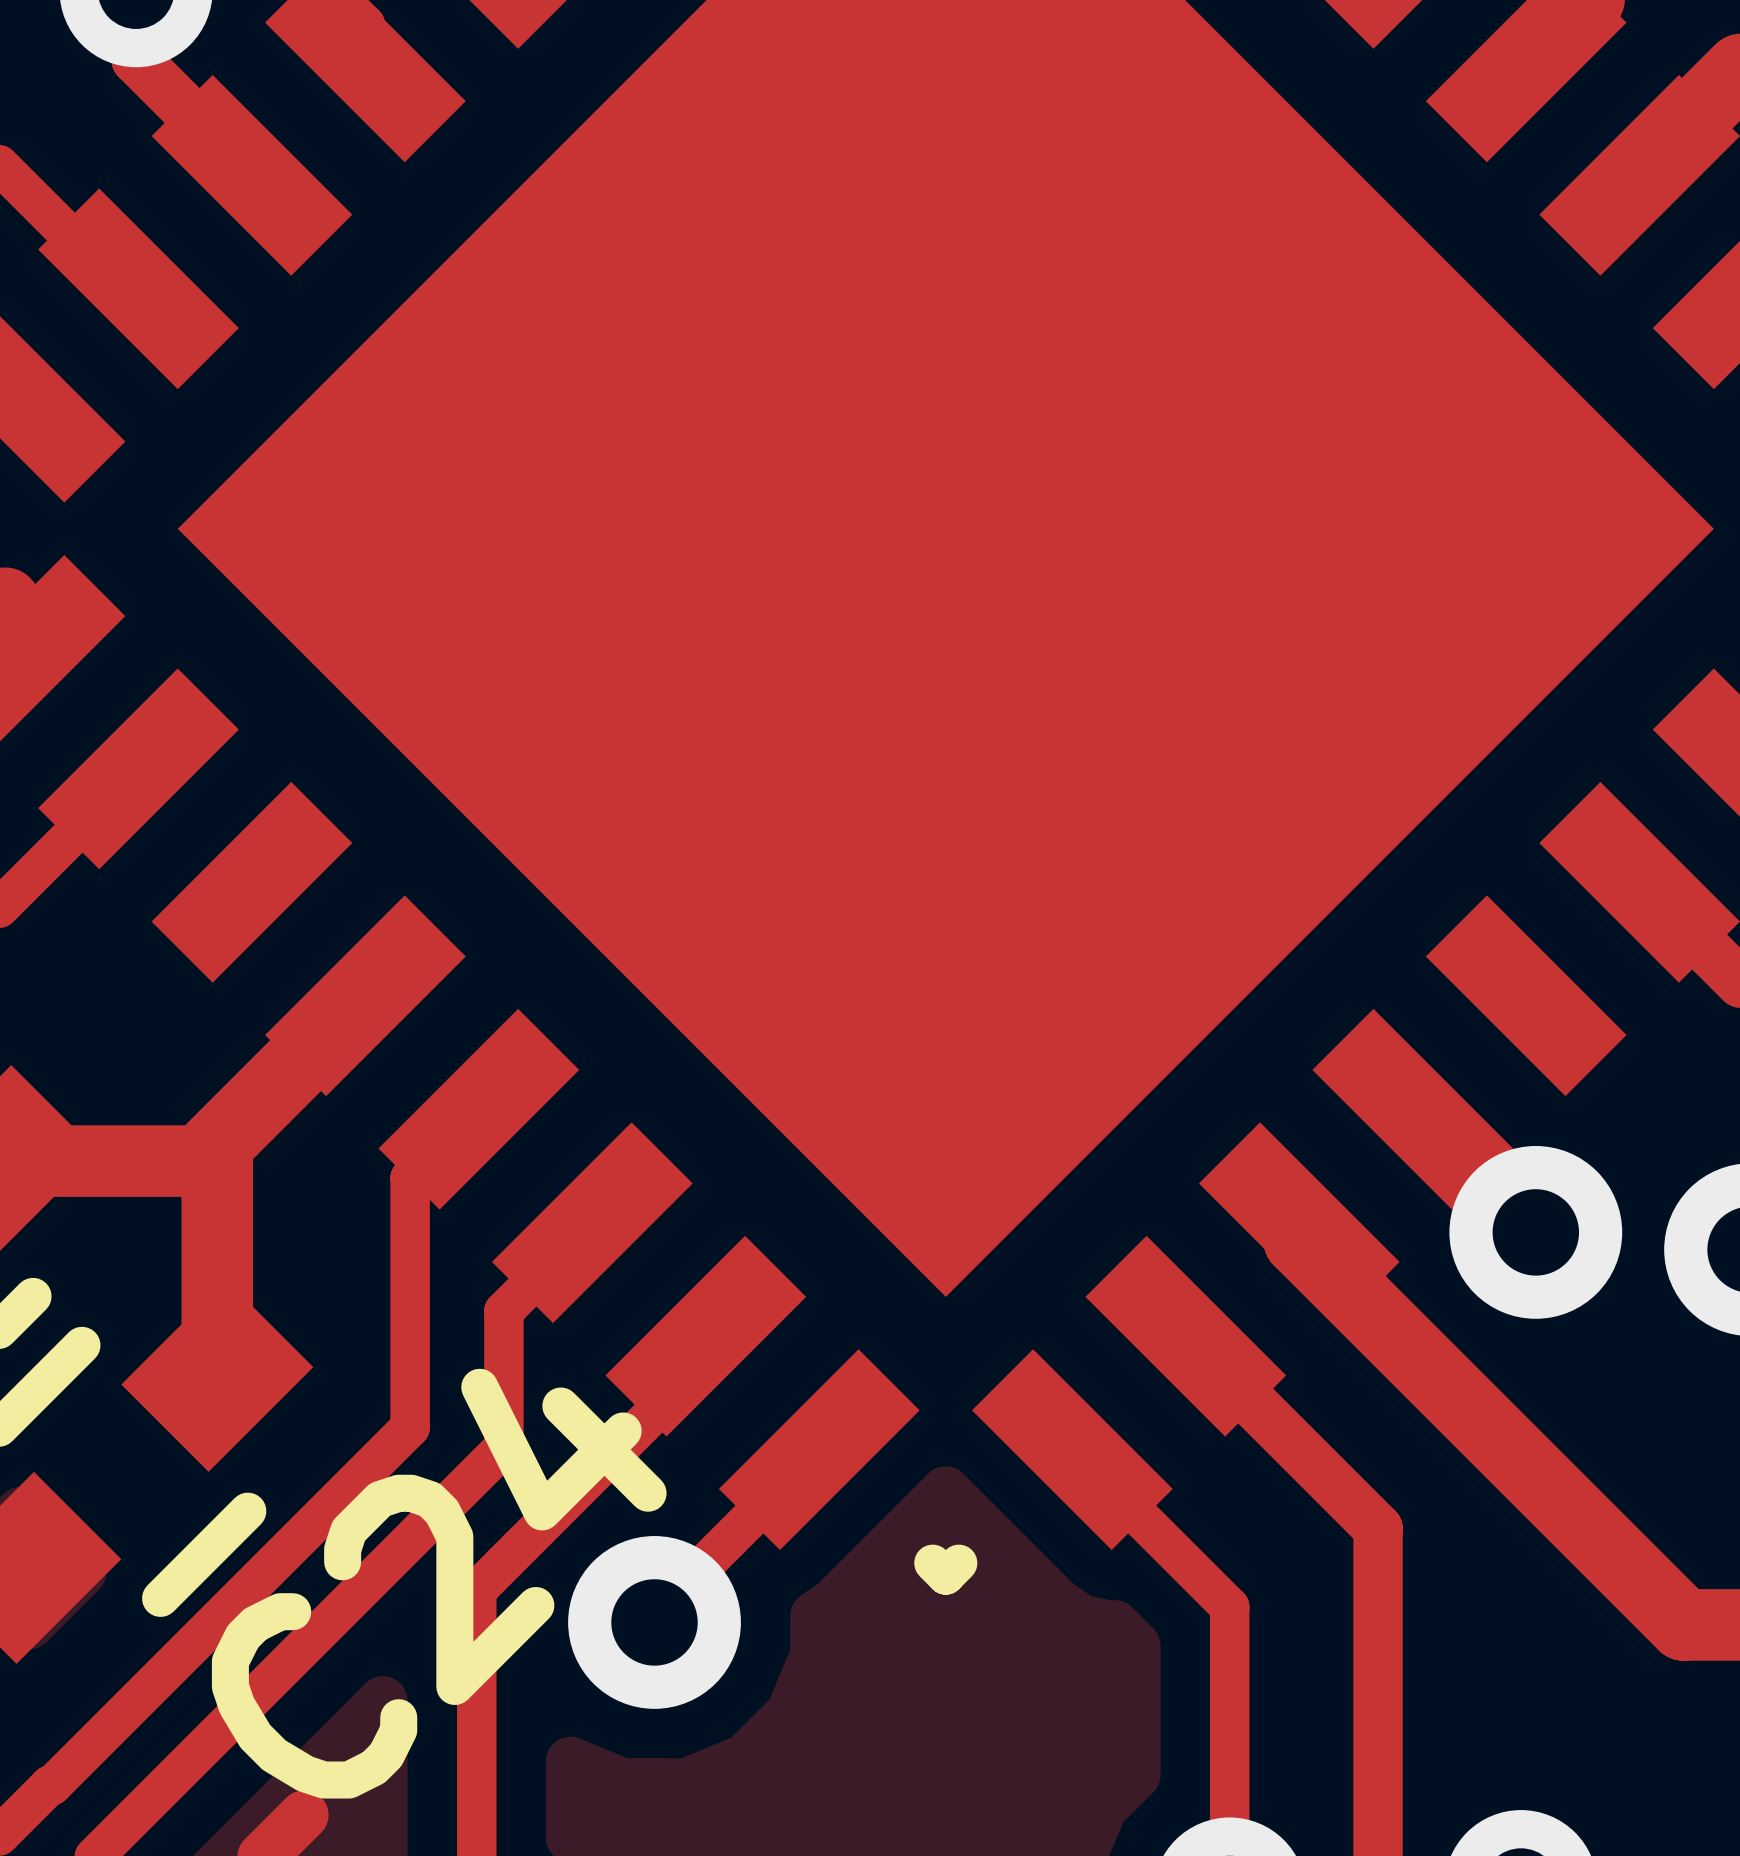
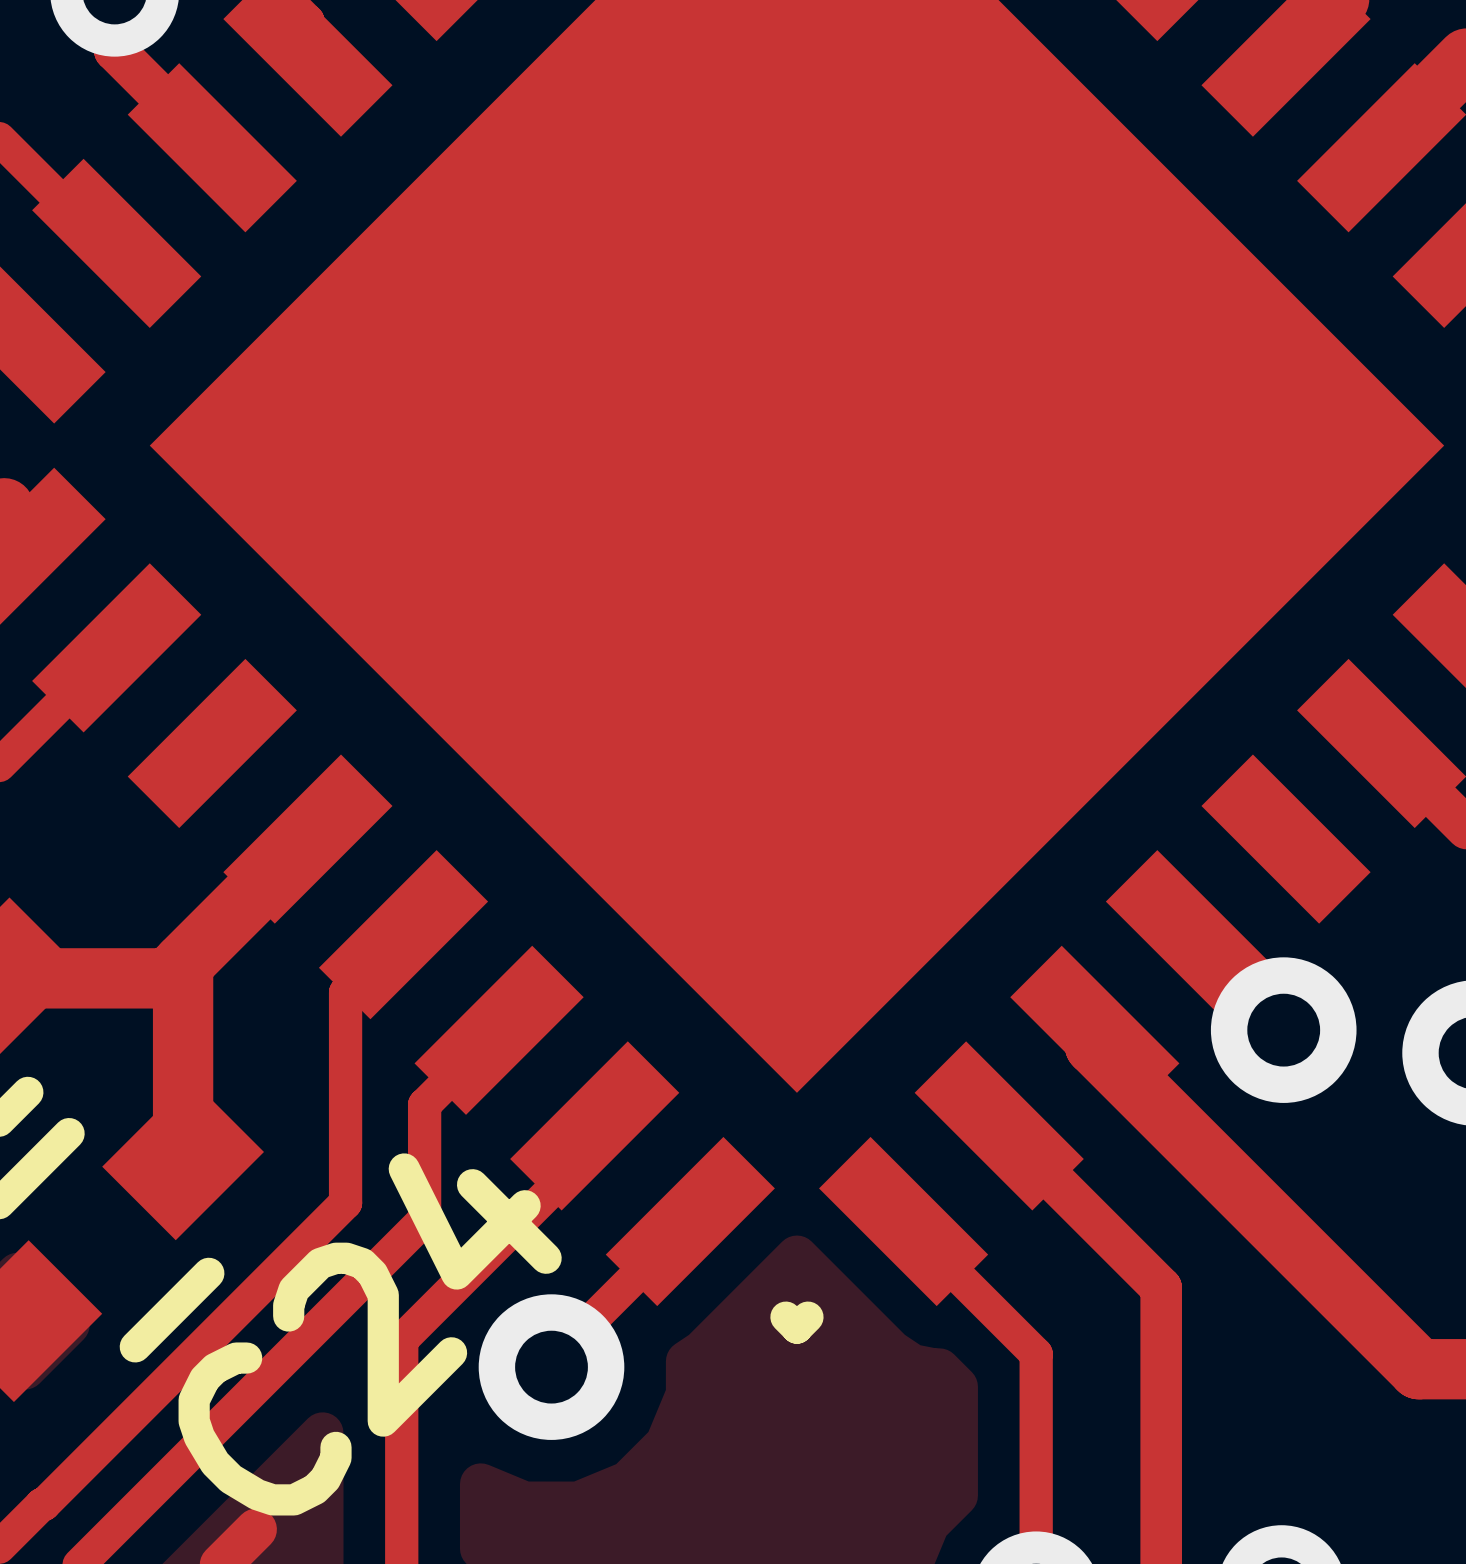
via position: (1535, 1232) -> (1283, 1030)

